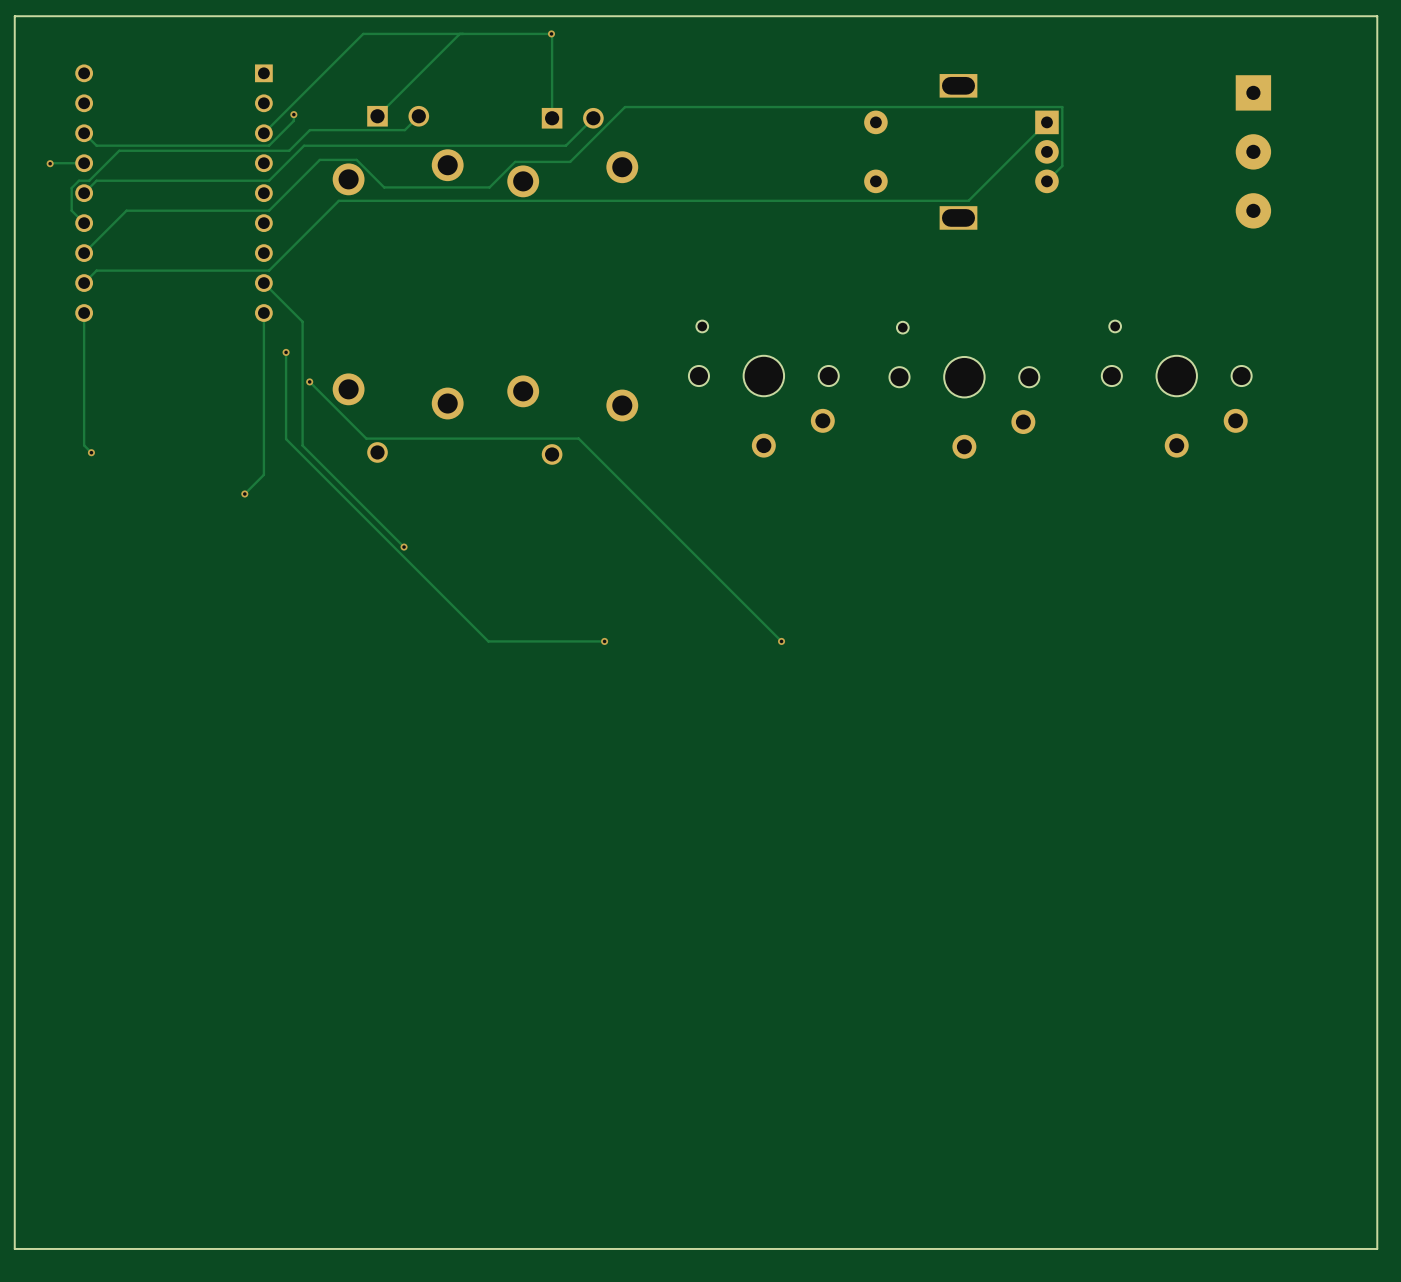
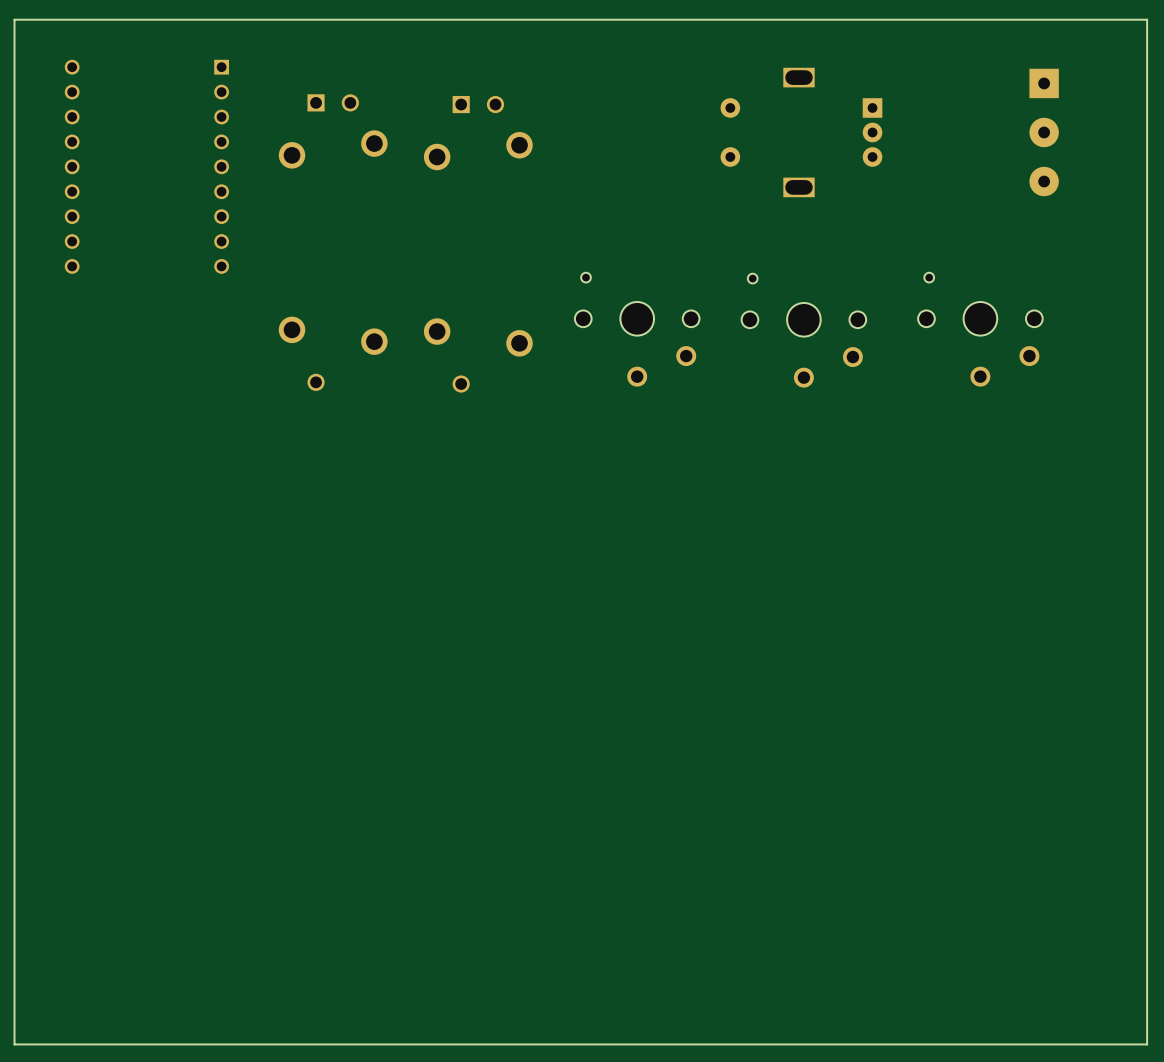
track: (459, 33) (377, 116) -> none
via: (551, 33) -> none
track: (293, 114) (293, 120) (269, 145) (96, 145) (84, 133) -> none
via: (293, 114) -> none
track: (418, 116) (404, 130) (309, 130) (289, 150) (119, 150) (89, 180) (78, 180) (71, 188) (71, 210) (84, 223) -> none
track: (552, 118) (551, 33) (363, 33) (263, 133) -> none
track: (593, 118) (565, 145) (304, 145) (269, 180) (96, 180) (84, 193) -> none
track: (1046, 122) (968, 200) (338, 200) (269, 270) (96, 270) (84, 283) -> none
via: (50, 163) -> none
track: (84, 163) (50, 163) -> none
track: (1046, 181) (1062, 166) (1062, 107) (625, 107) (570, 161) (515, 161) (489, 187) (384, 187) (356, 159) (319, 159) (269, 210) (126, 210) (84, 253) -> none
track: (263, 283) (302, 321) (302, 445) (404, 547) -> none
track: (84, 313) (84, 445) (91, 452) -> none
track: (263, 313) (263, 474) (244, 493) -> none
track: (286, 352) (286, 439) (488, 641) (604, 641) -> none
via: (286, 352) -> none
track: (309, 381) (366, 438) (578, 438) (781, 641) -> none
via: (309, 381) -> none
via: (91, 452) -> none
via: (244, 493) -> none
via: (404, 547) -> none
via: (604, 641) -> none
via: (781, 641) -> none

